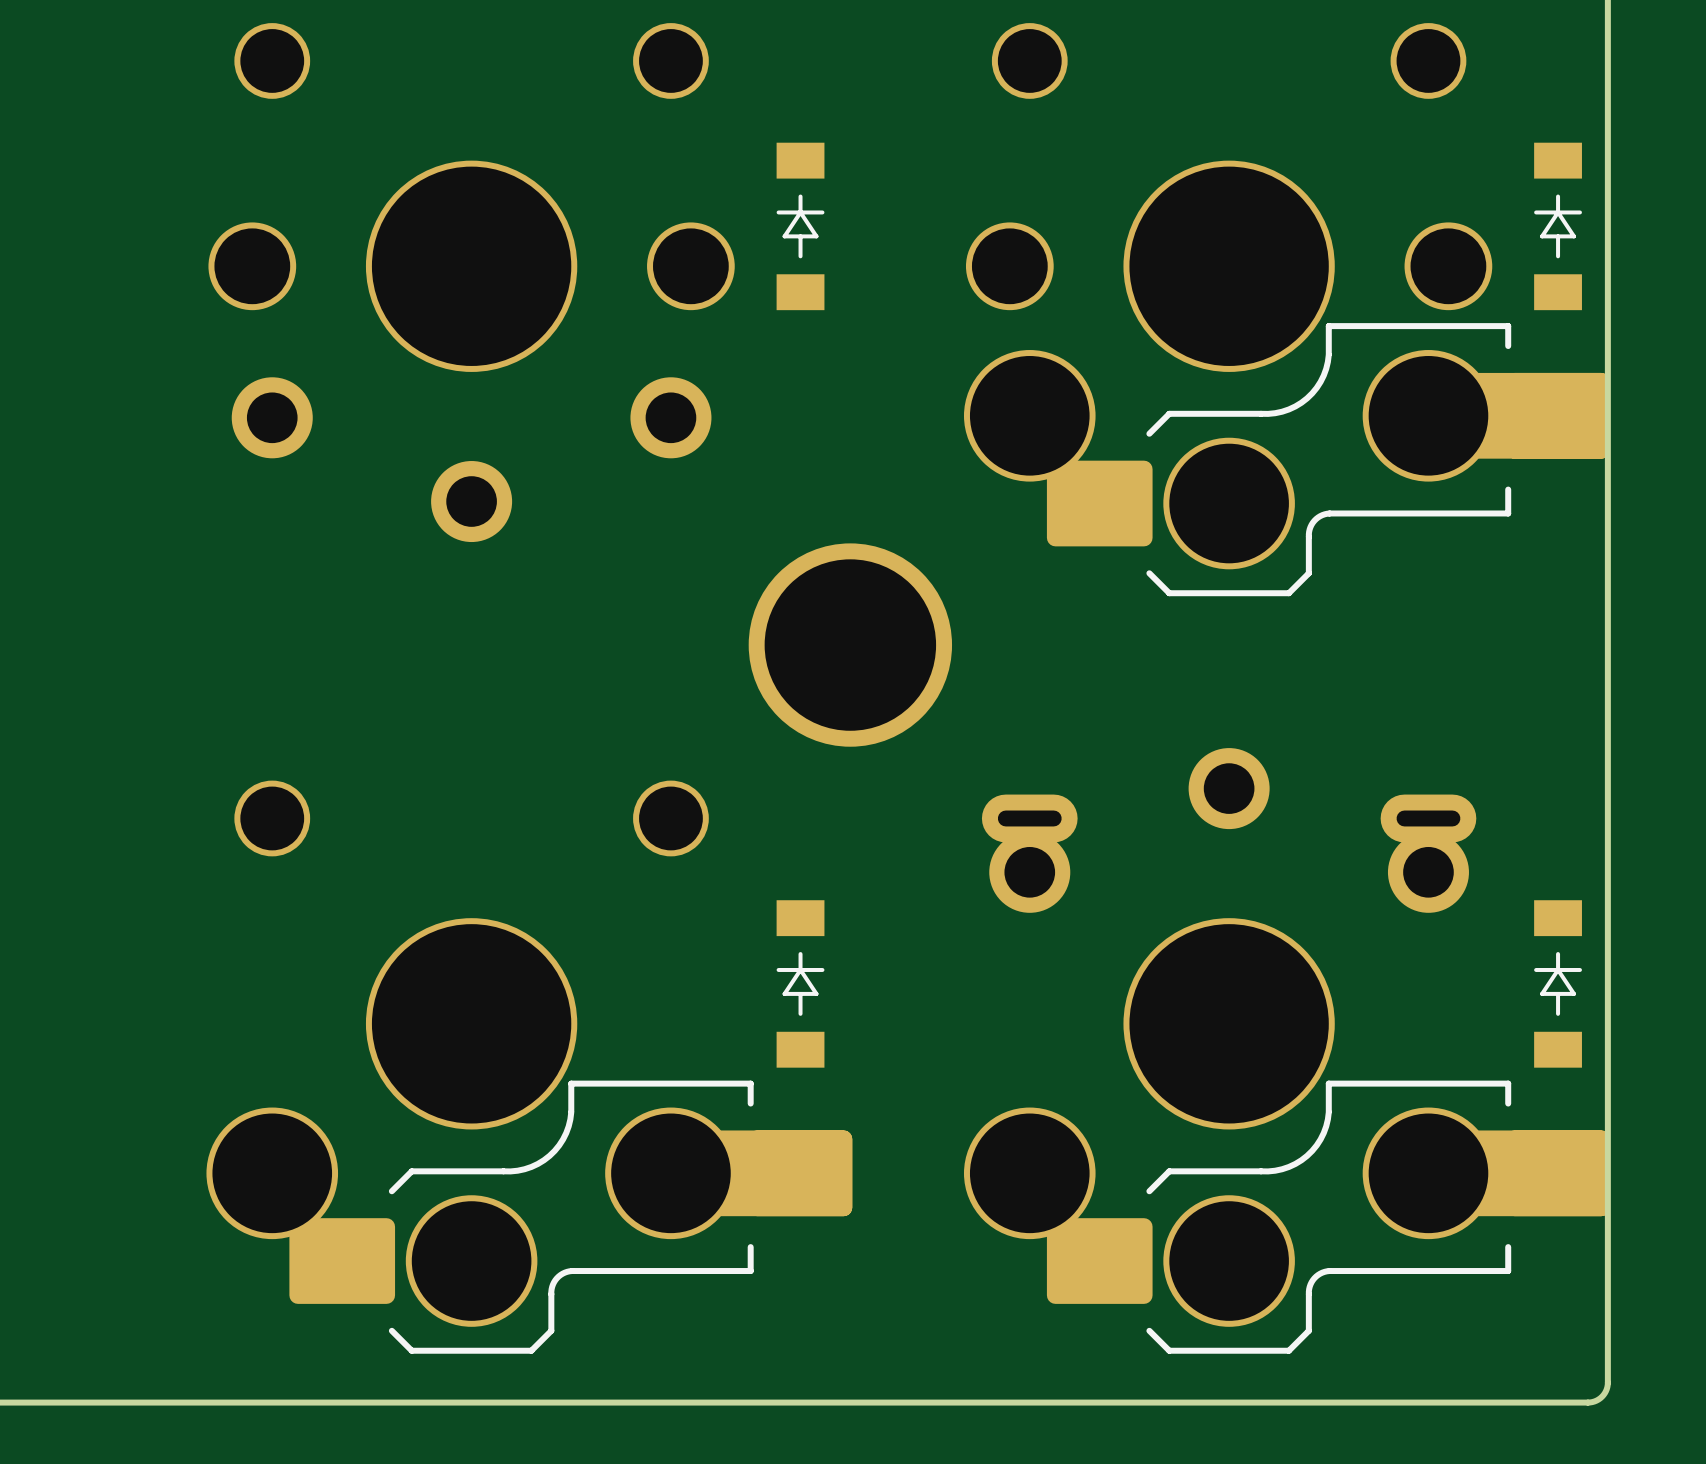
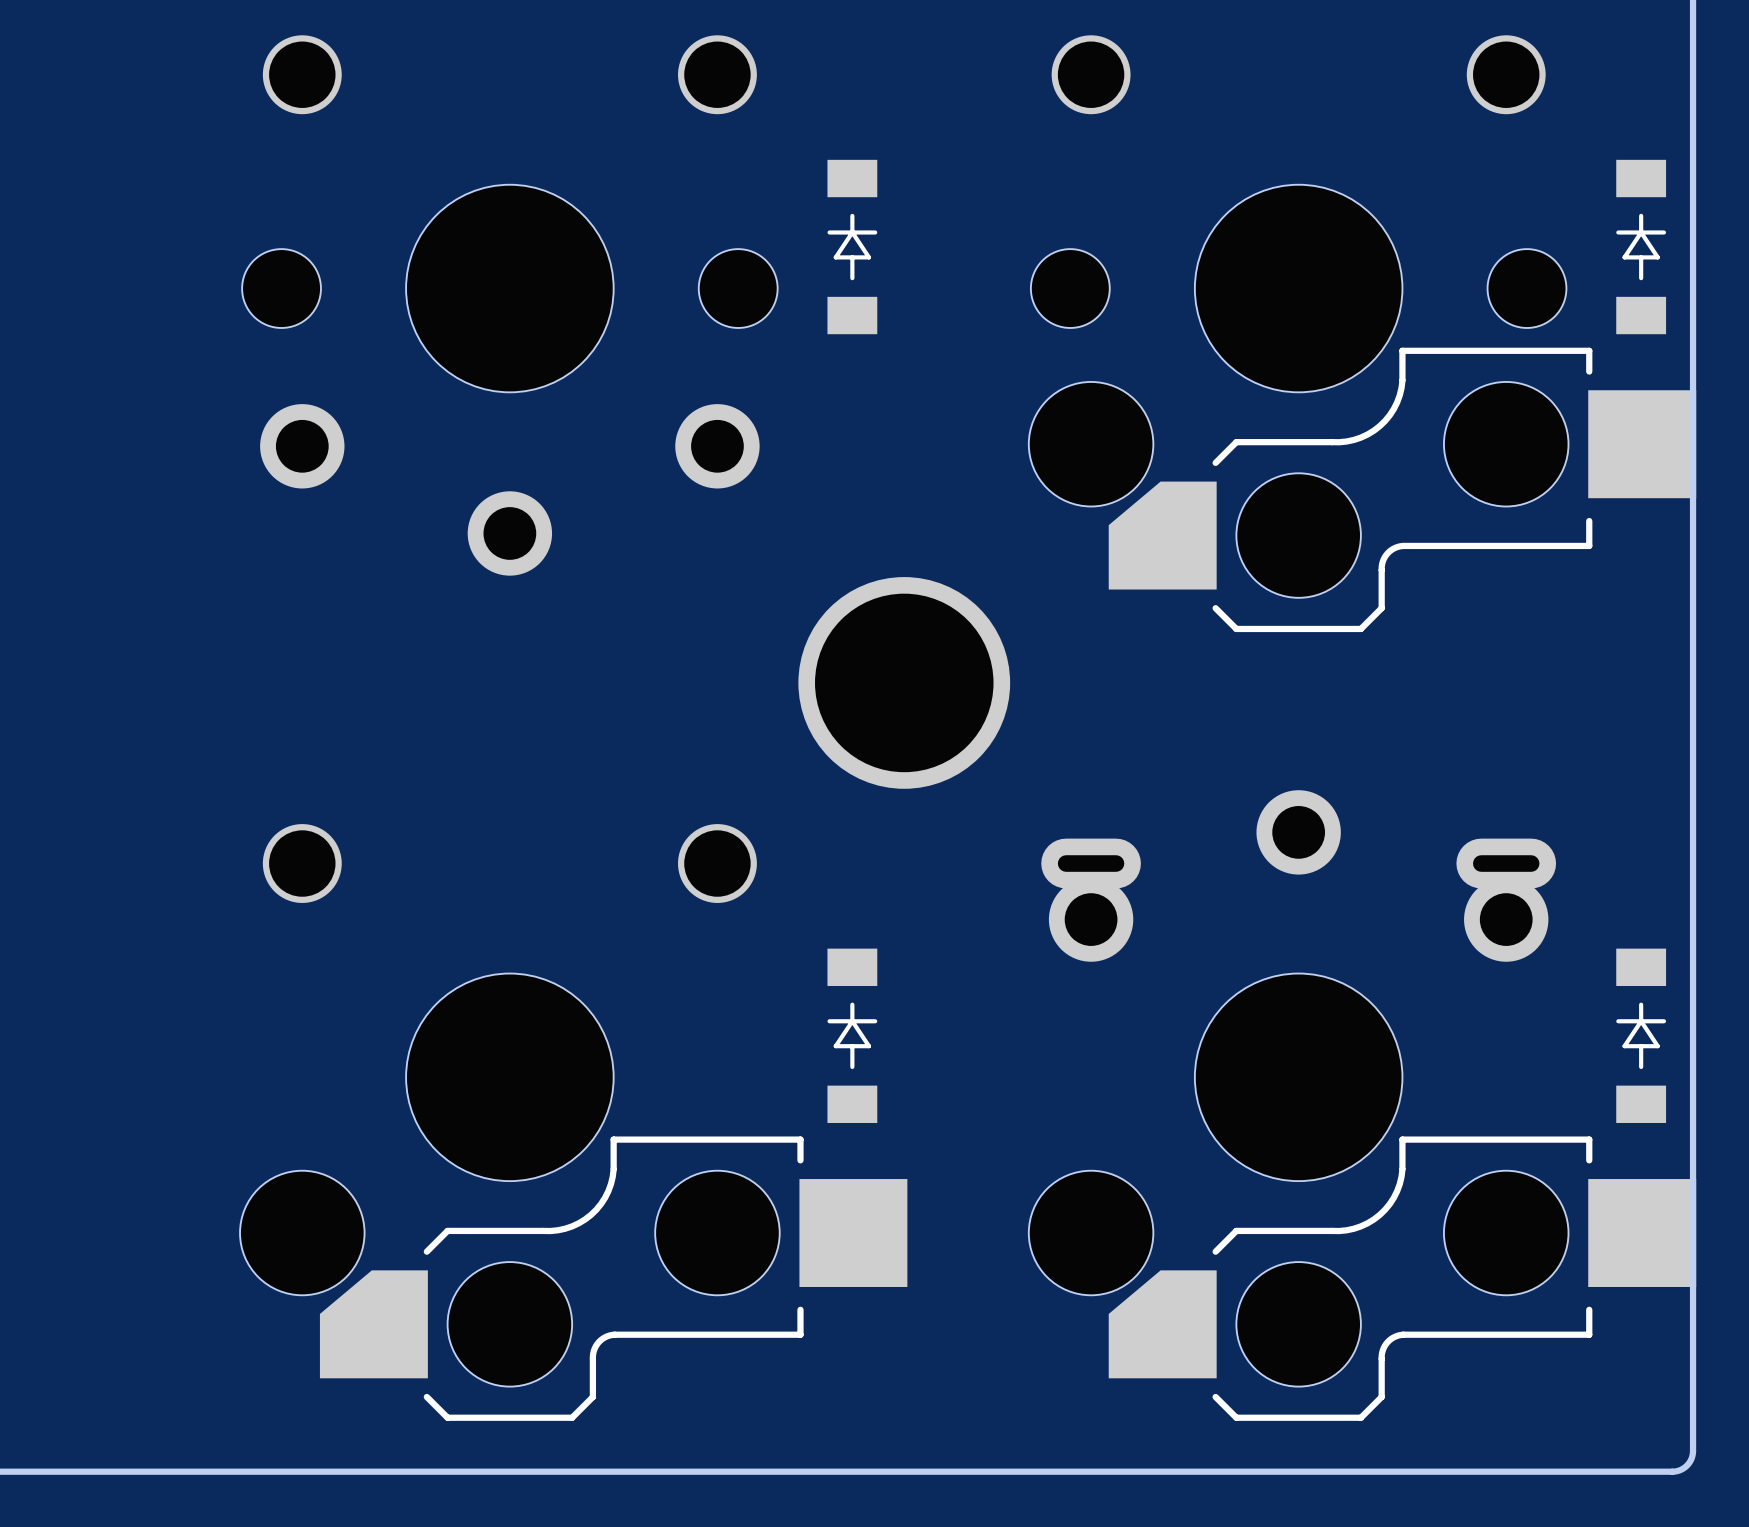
part footprint: [208, 23, 735, 543] -> [242, 35, 778, 576]
part footprint: [963, 23, 1610, 597] -> [1028, 35, 1697, 633]
part footprint: [963, 748, 1610, 1354] -> [1028, 790, 1697, 1421]
part footprint: [206, 780, 853, 1354] -> [240, 824, 908, 1421]

